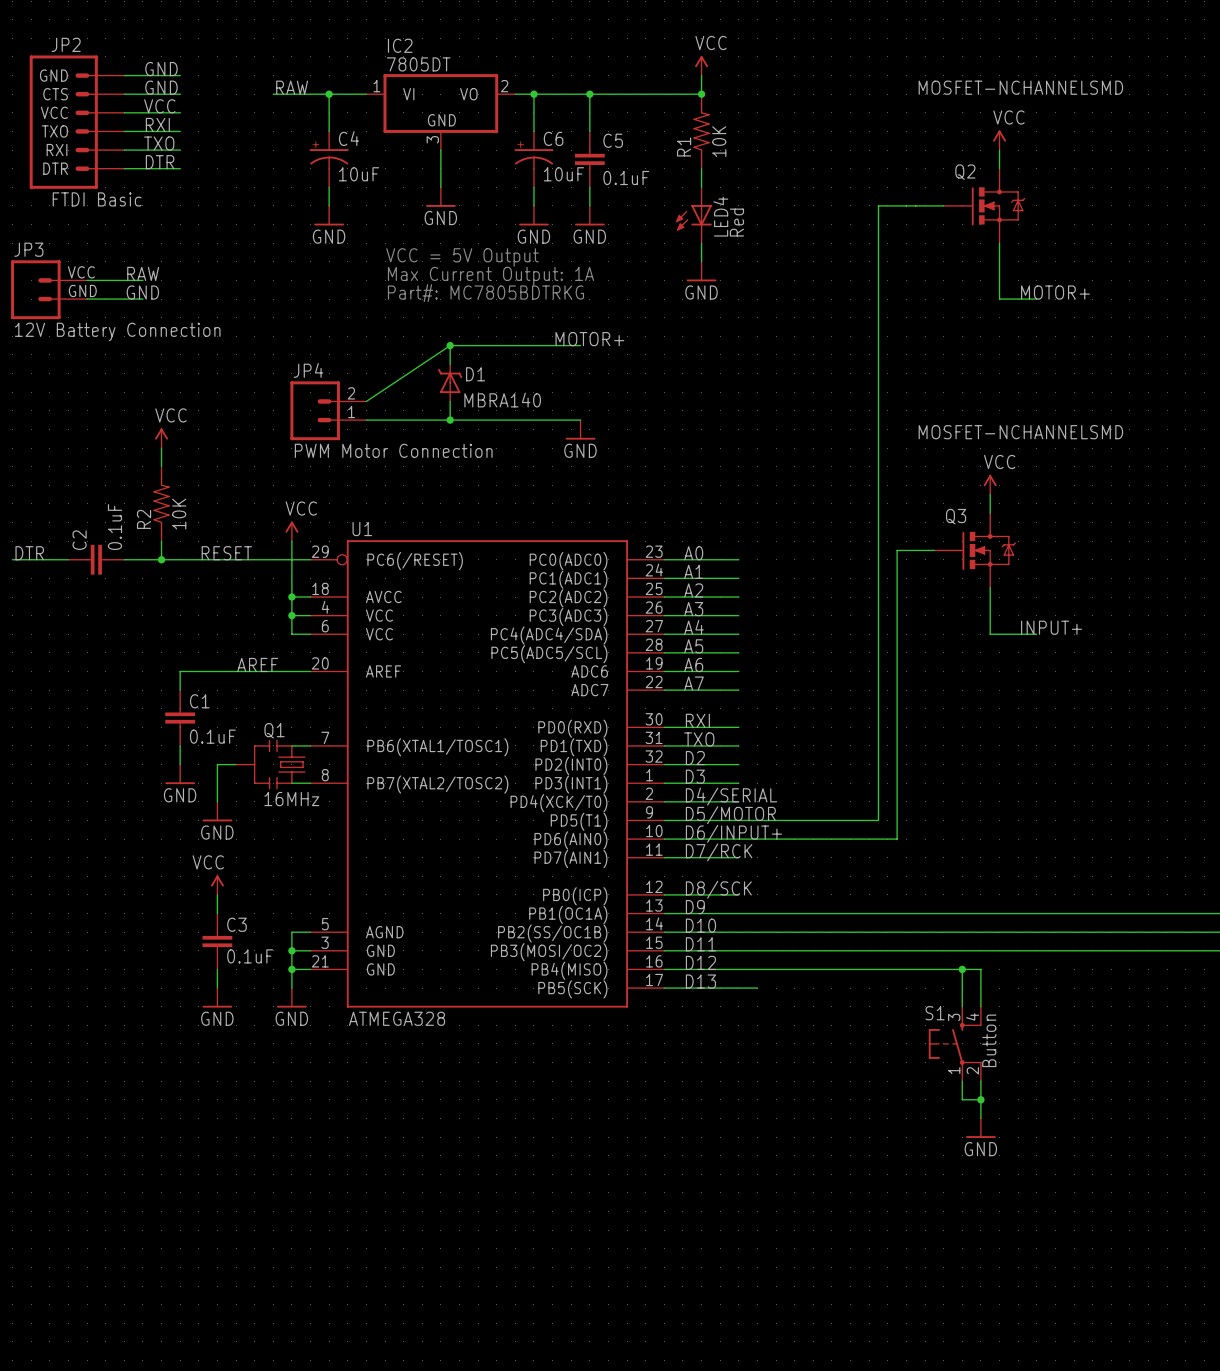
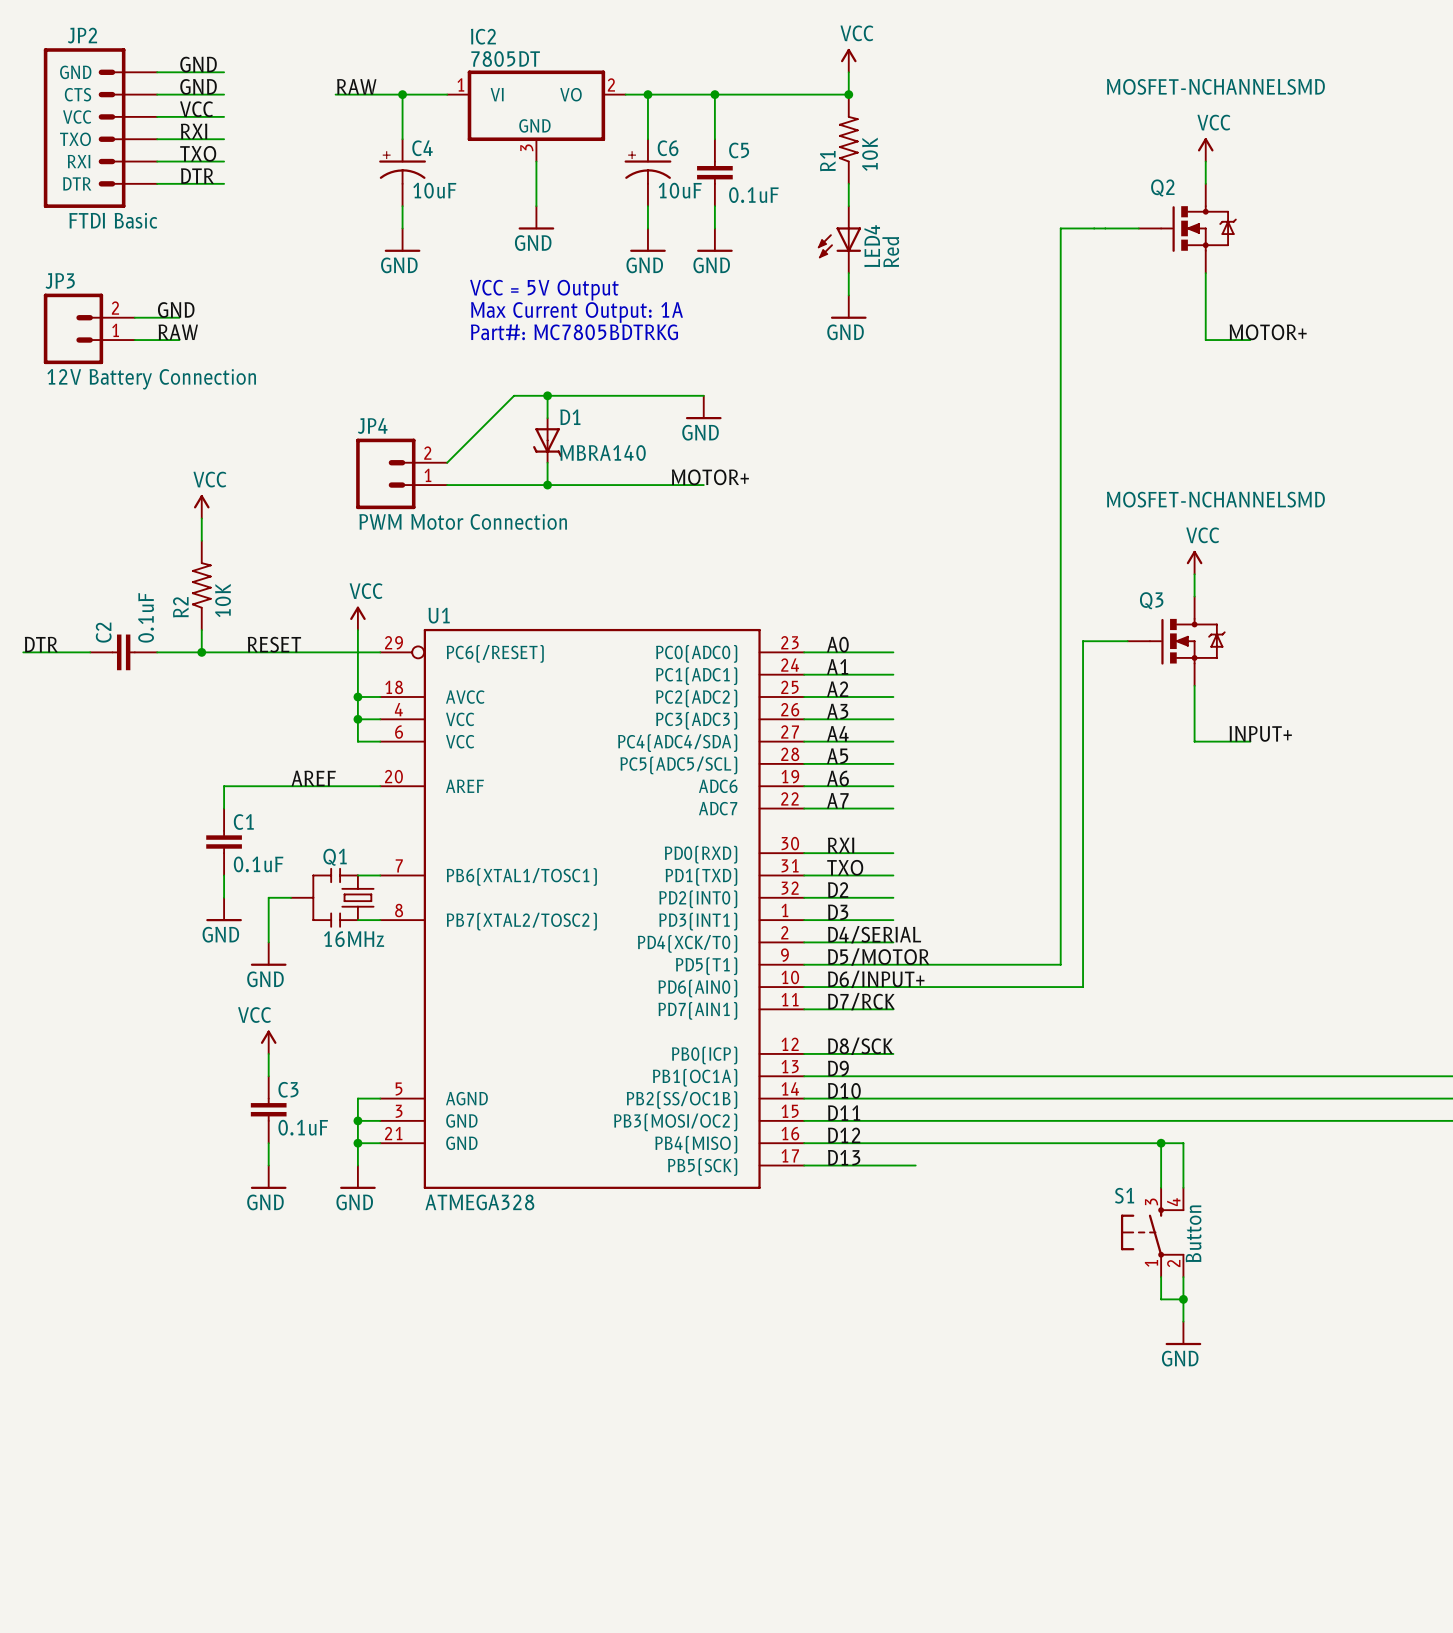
JP3 pin number: VCC (81, 272) -> 2 (115, 308)
label: RAW (143, 273) -> GND (176, 309)
JP3 position: (49, 289) -> (89, 328)
JP3 pin number: GND (82, 290) -> 1 (115, 330)
label: GND (142, 292) -> RAW (178, 332)
label position: MOTOR+ (589, 339) -> MOTOR+ (710, 477)
wire: (450, 345) (366, 401) -> (547, 395) (514, 395) (447, 462)
D1 rotation: 0° (450, 380) -> 180° (547, 442)
power symbol position: GND (580, 429) -> GND (703, 407)

